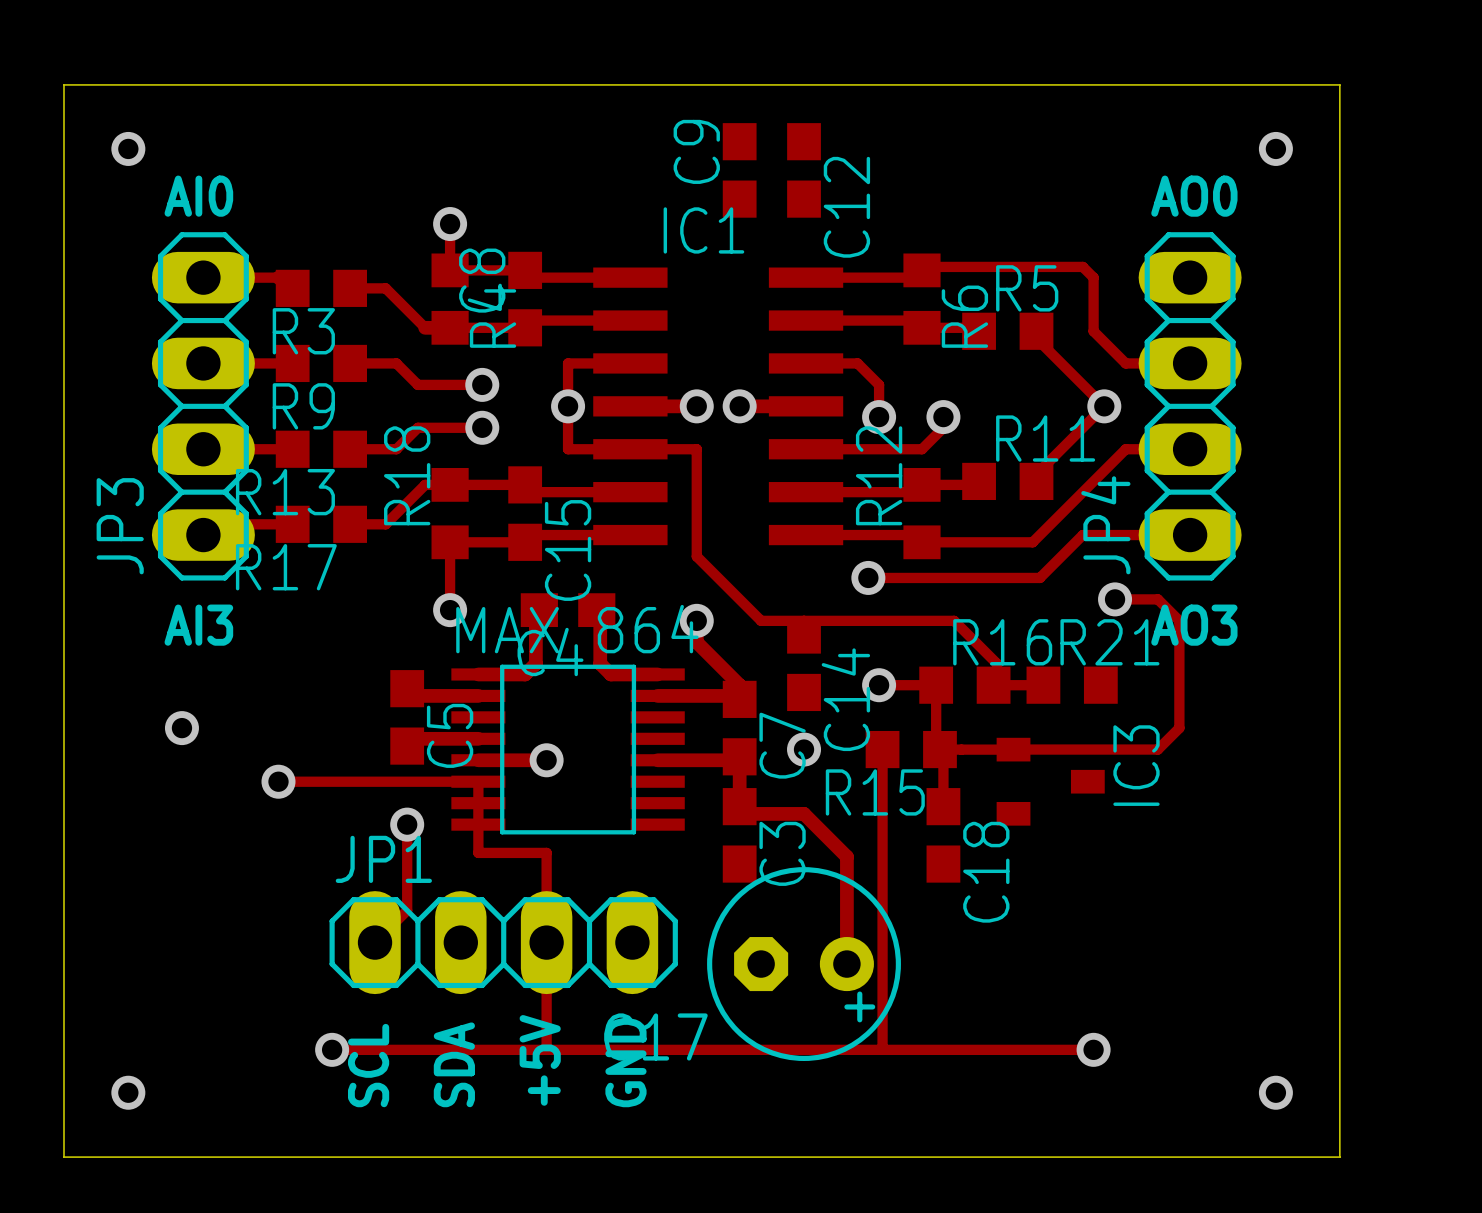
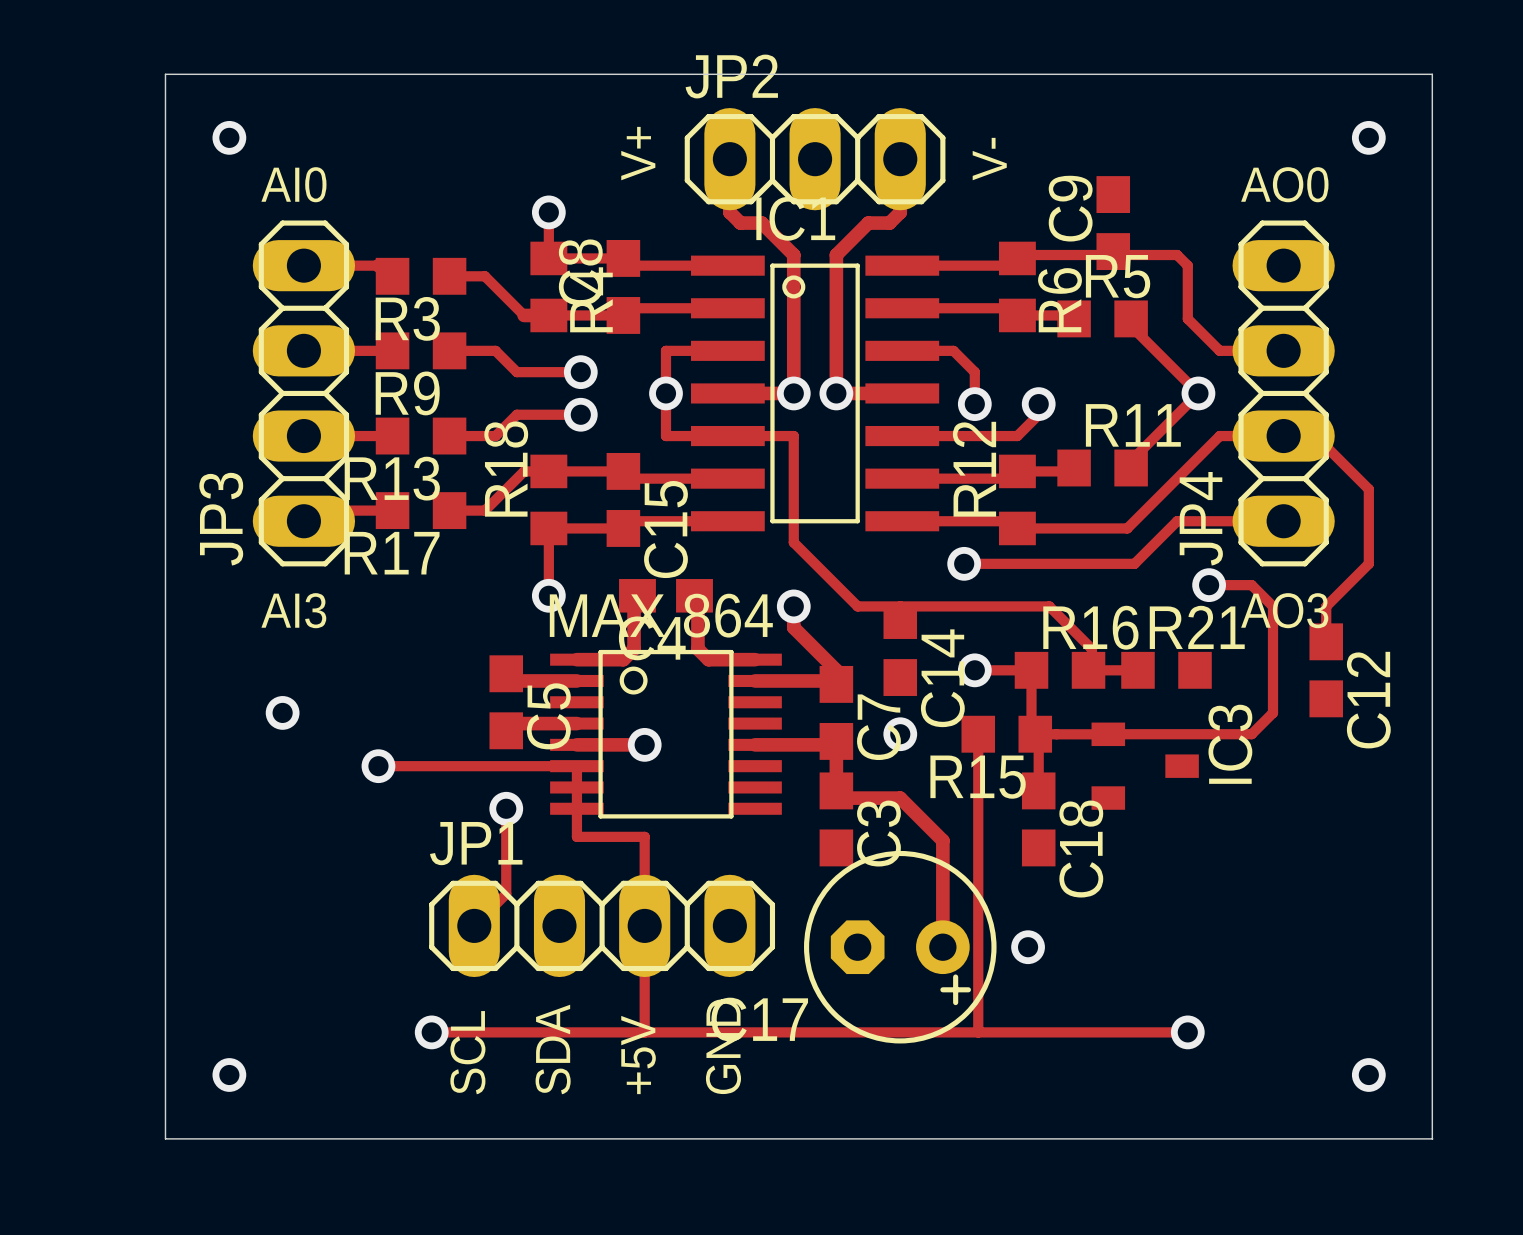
text: none -> V+ (638, 153)
text: none -> V- (989, 159)
track: none -> (729, 159) (729, 212) (740, 223) (761, 223) (793, 255) (793, 393)
JP2: none -> (815, 159)
C9 position: (739, 170) -> (1113, 223)
track: none -> (900, 159) (900, 212) (889, 223) (868, 223) (836, 255) (836, 393)
C12 position: (804, 170) -> (1326, 670)
IC1 footprint: [593, 267, 844, 546] -> [690, 255, 940, 532]
track: none -> (1283, 436) (1315, 436) (1368, 489) (1368, 563) (1326, 606) (1326, 641)
part footprint: [451, 664, 685, 835] -> [550, 649, 782, 819]
via: none -> (1028, 947)

